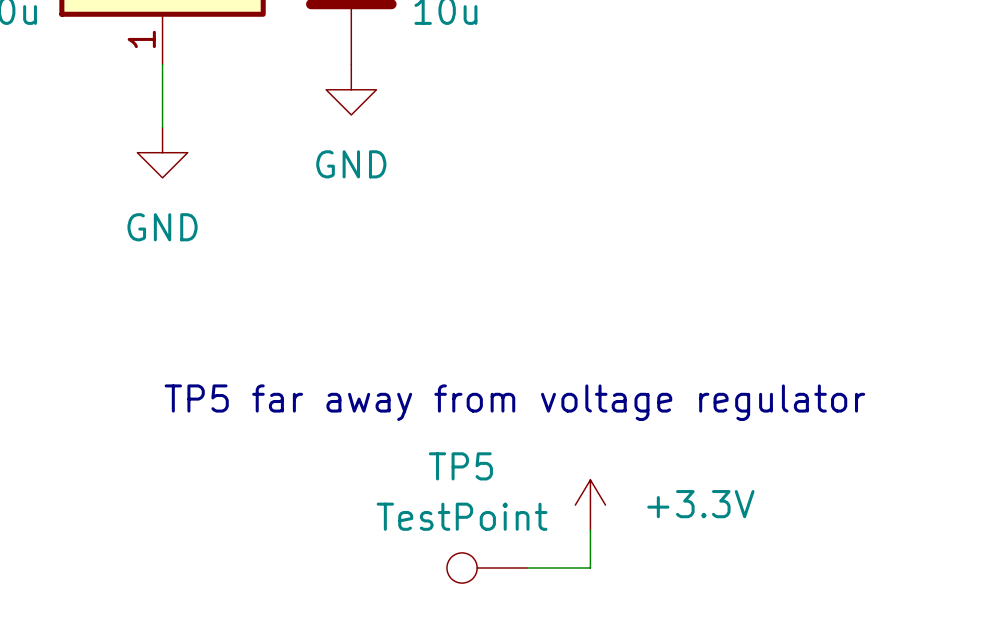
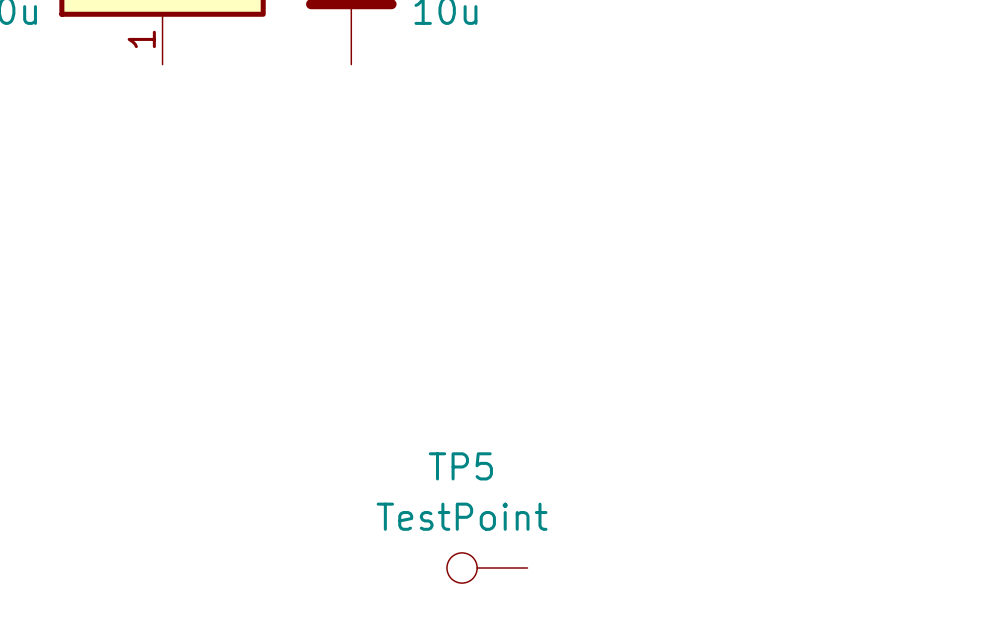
wire: (162, 64) (162, 127) -> none
power symbol: GND (351, 89) -> none
power symbol: GND (162, 152) -> none
text: TP5 far away from voltage regulator (514, 402) -> none
power symbol: +3.3V (590, 505) -> none
wire: (590, 530) (590, 568) (527, 568) -> none

